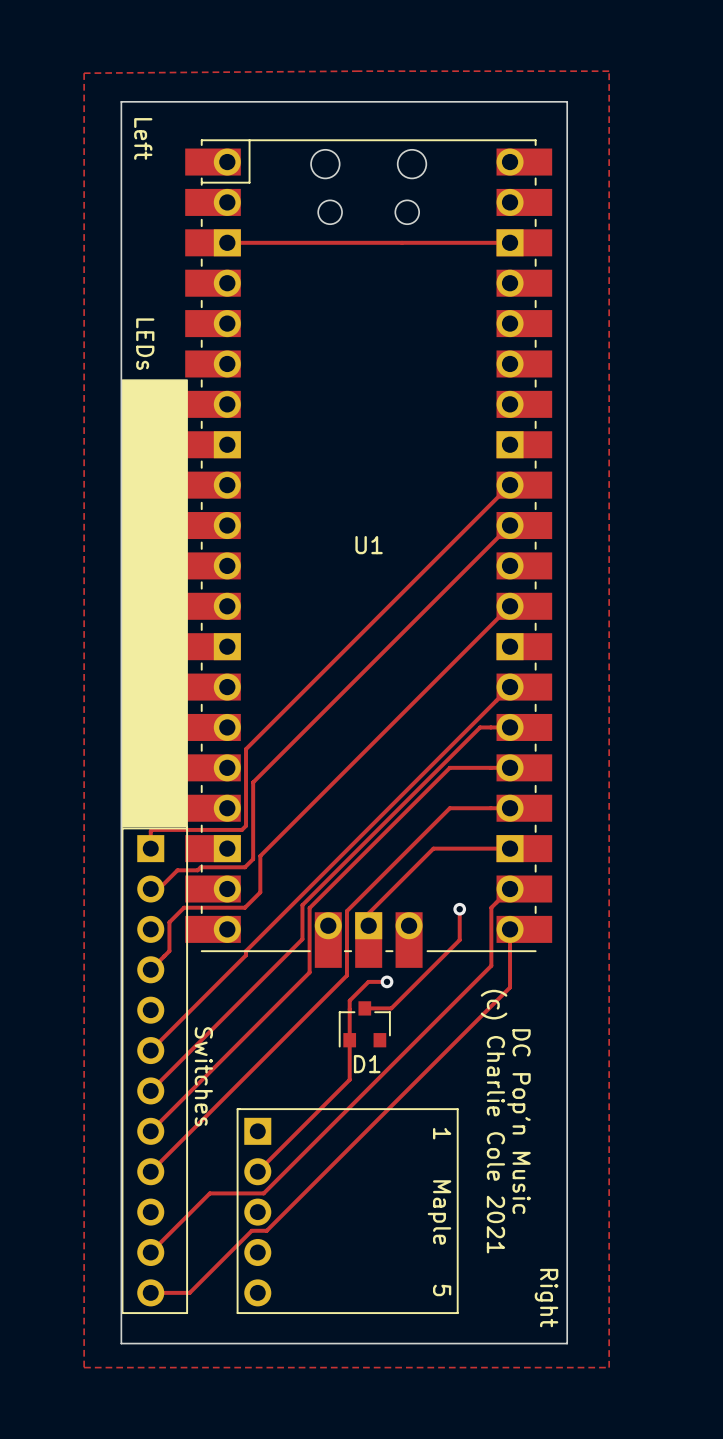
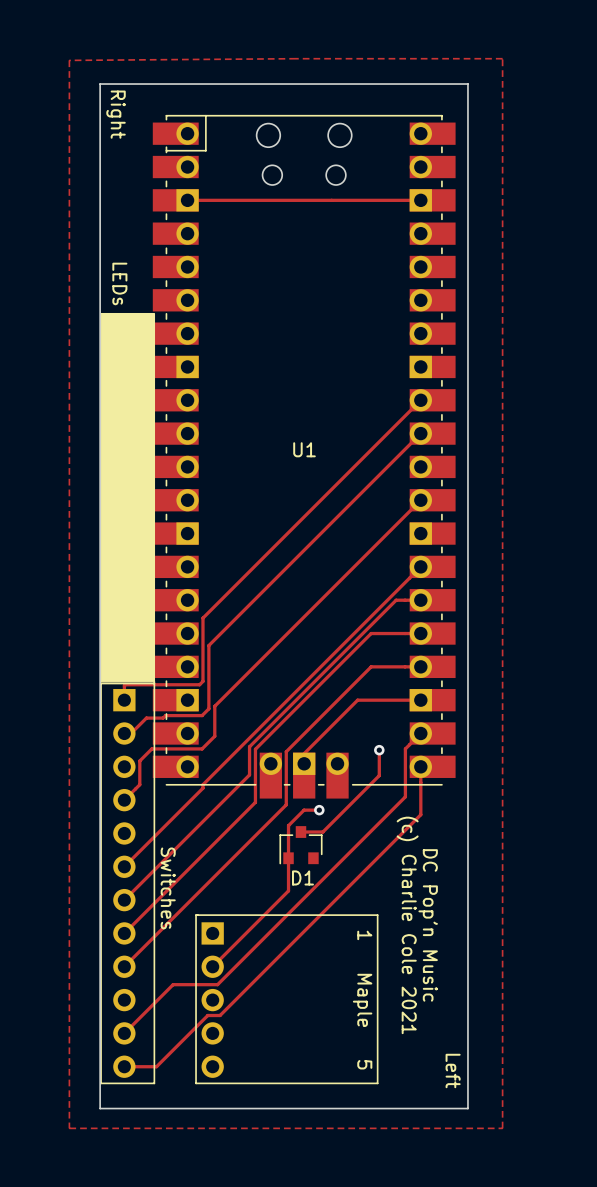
text: Left (143, 138) -> Right (116, 114)
text: Right (546, 1298) -> Left (453, 1071)

